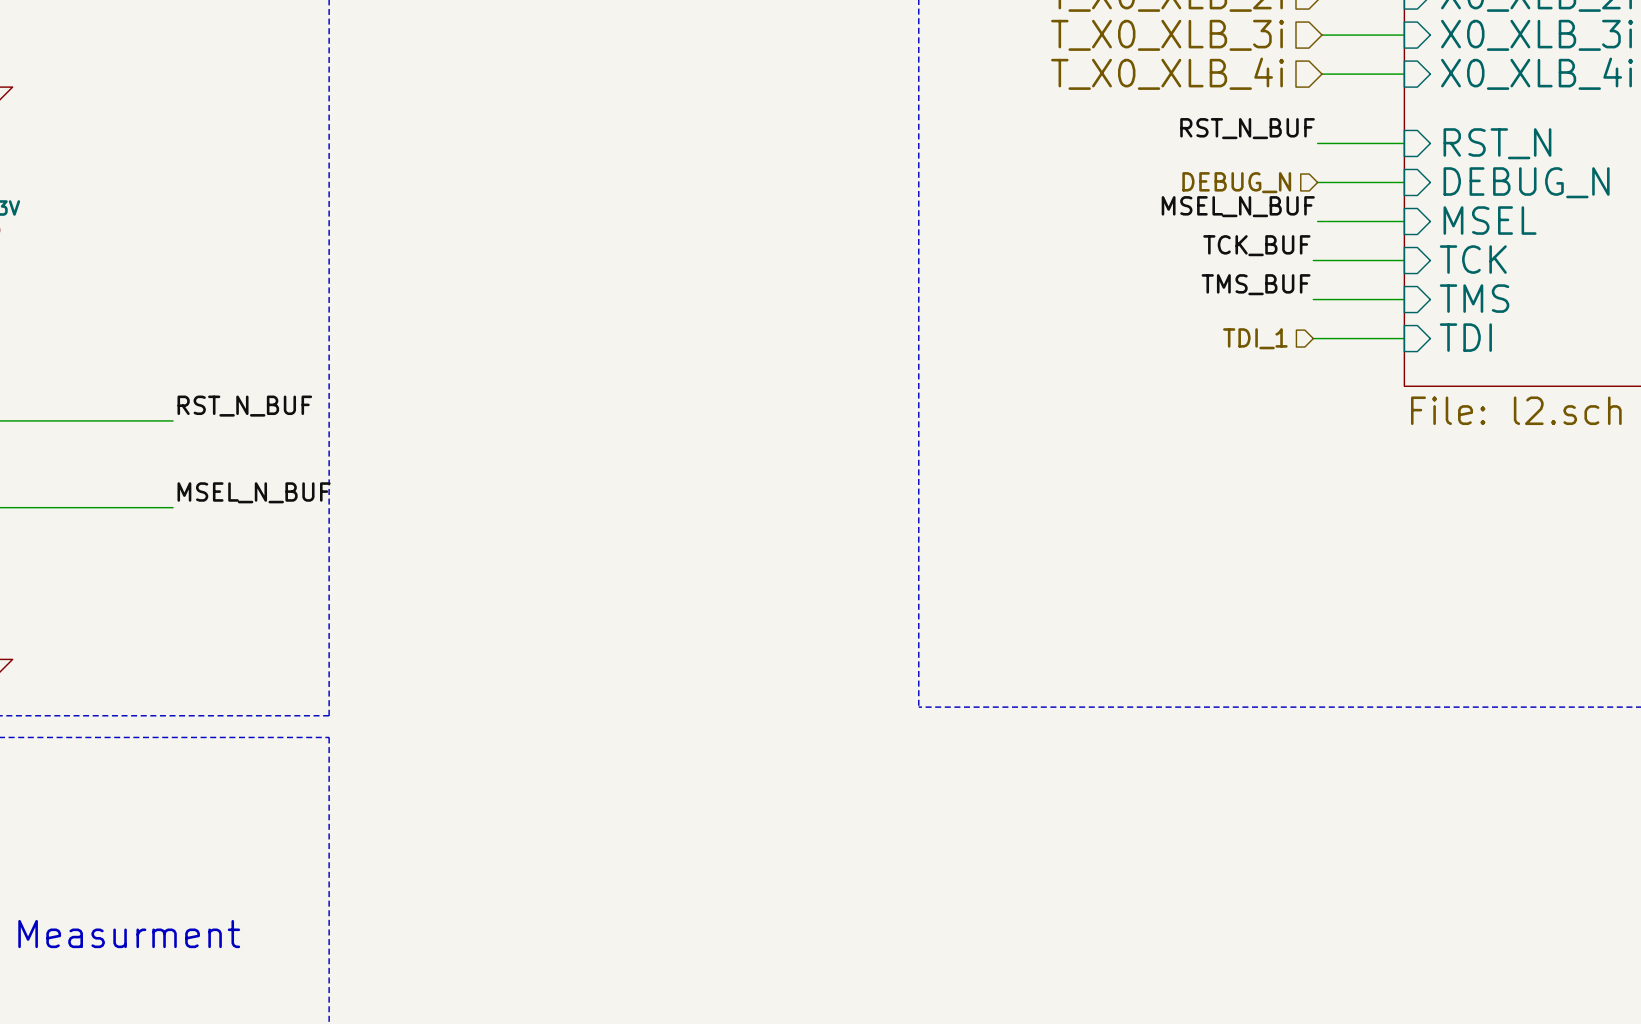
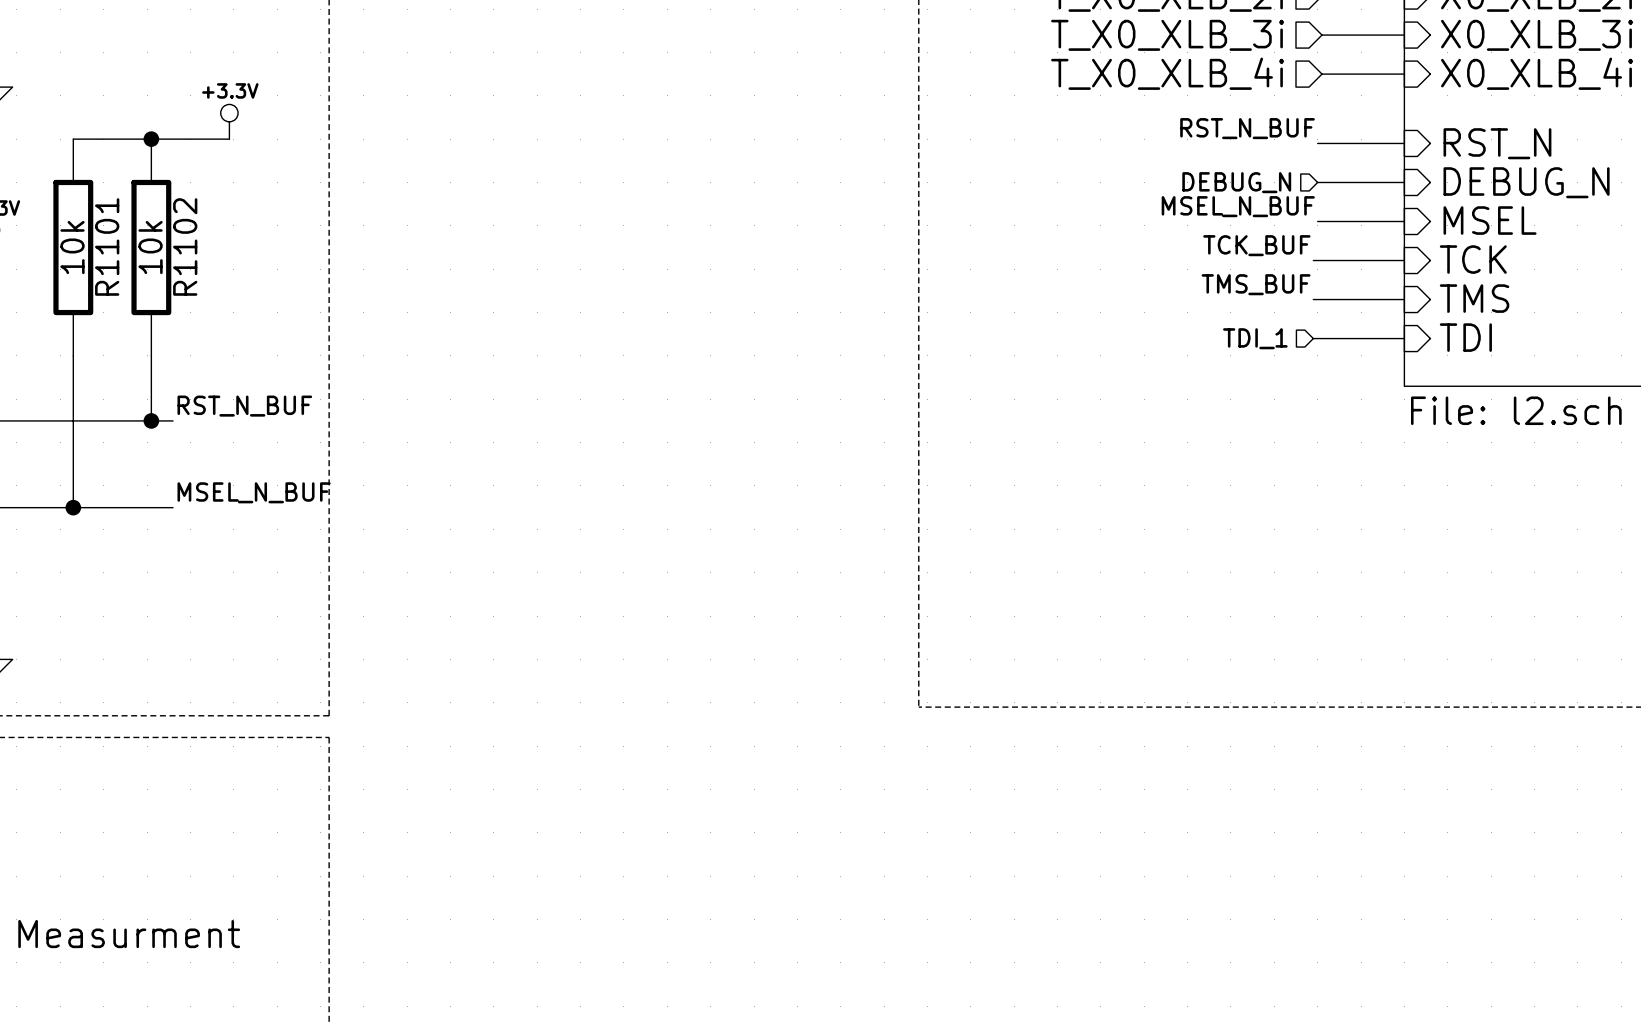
power symbol: none -> +3.3V (229, 121)
wire: none -> (73, 139) (229, 139)
junction: none -> (151, 139)
R1101: none -> 10k (73, 247)
R1102: none -> 10k (151, 247)
wire: none -> (73, 355) (73, 507)
wire: none -> (151, 355) (151, 420)
junction: none -> (151, 420)
junction: none -> (73, 507)

